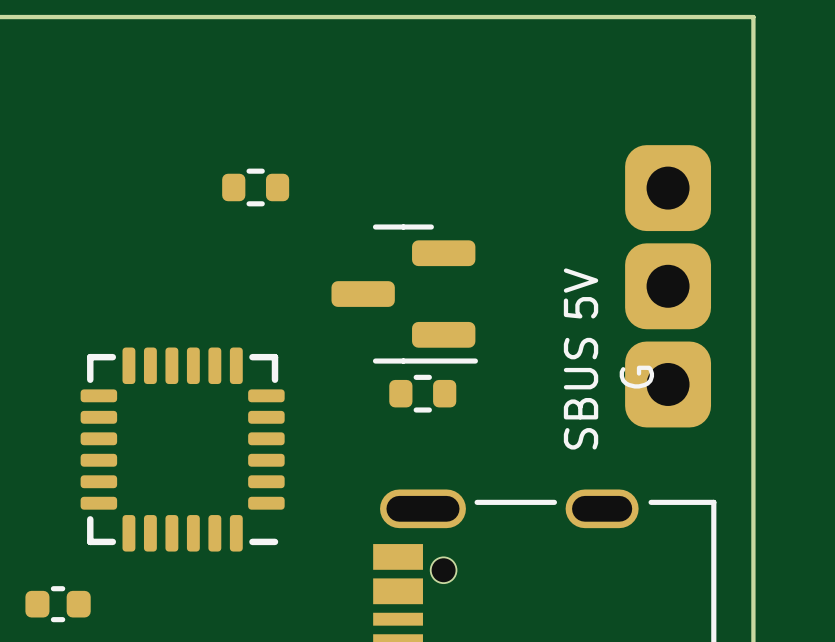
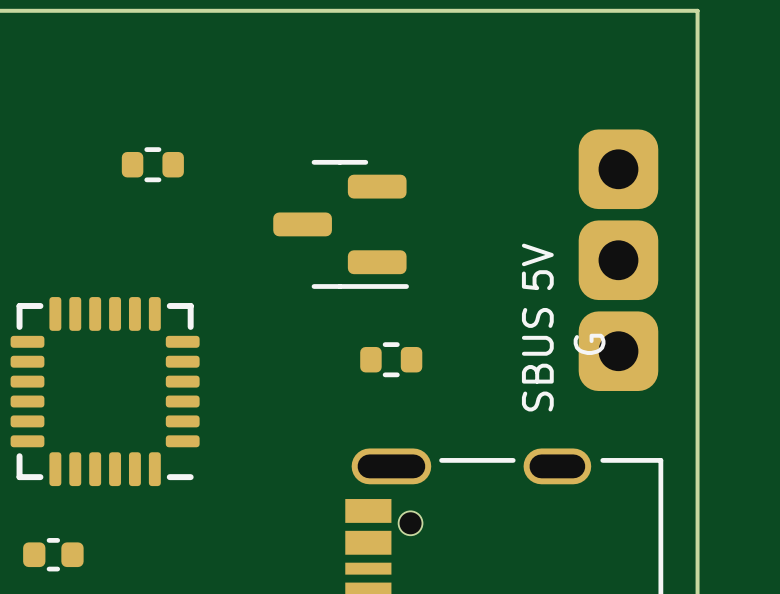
part position: (255, 187) -> (152, 164)
part position: (404, 294) -> (341, 224)
part position: (182, 449) -> (105, 391)

